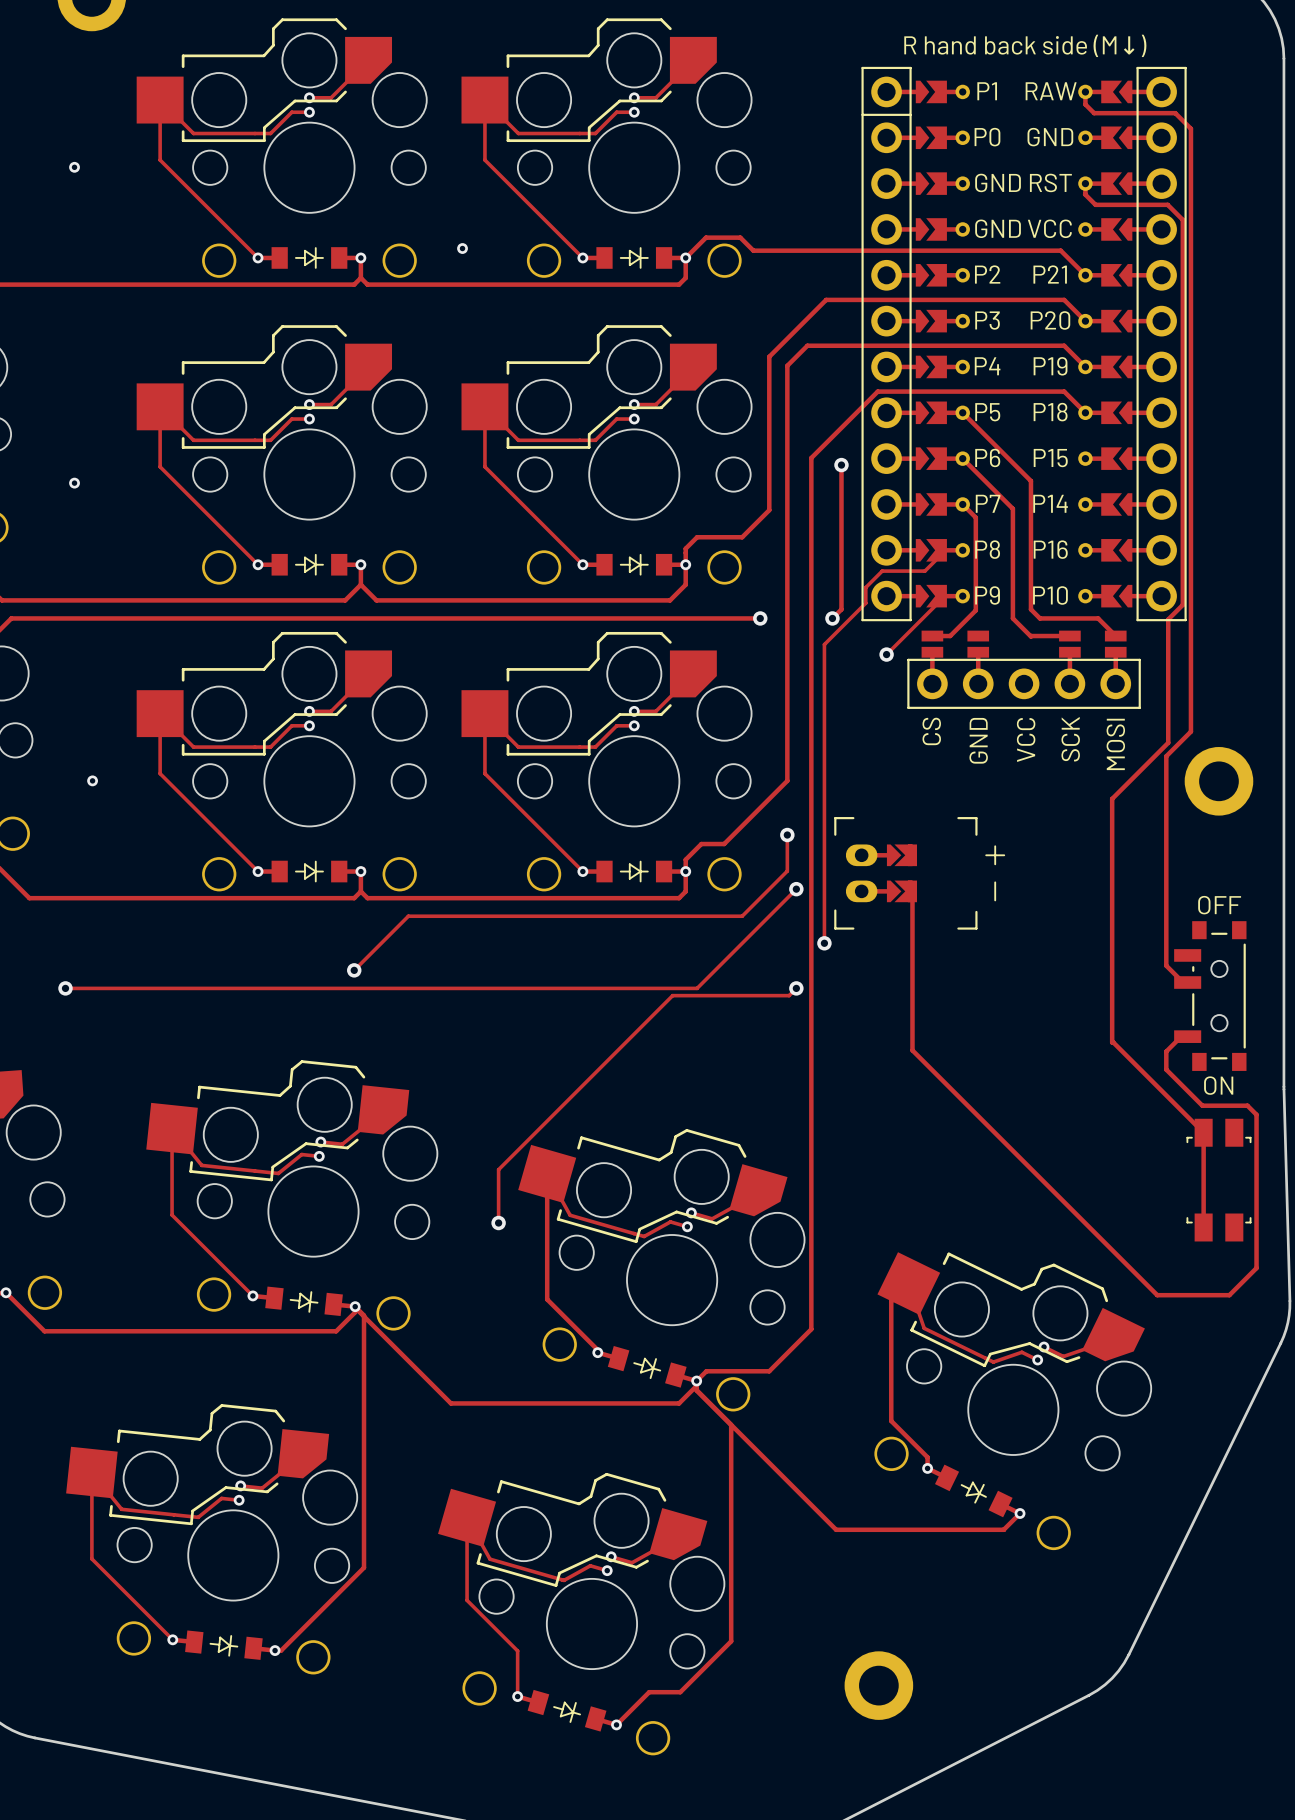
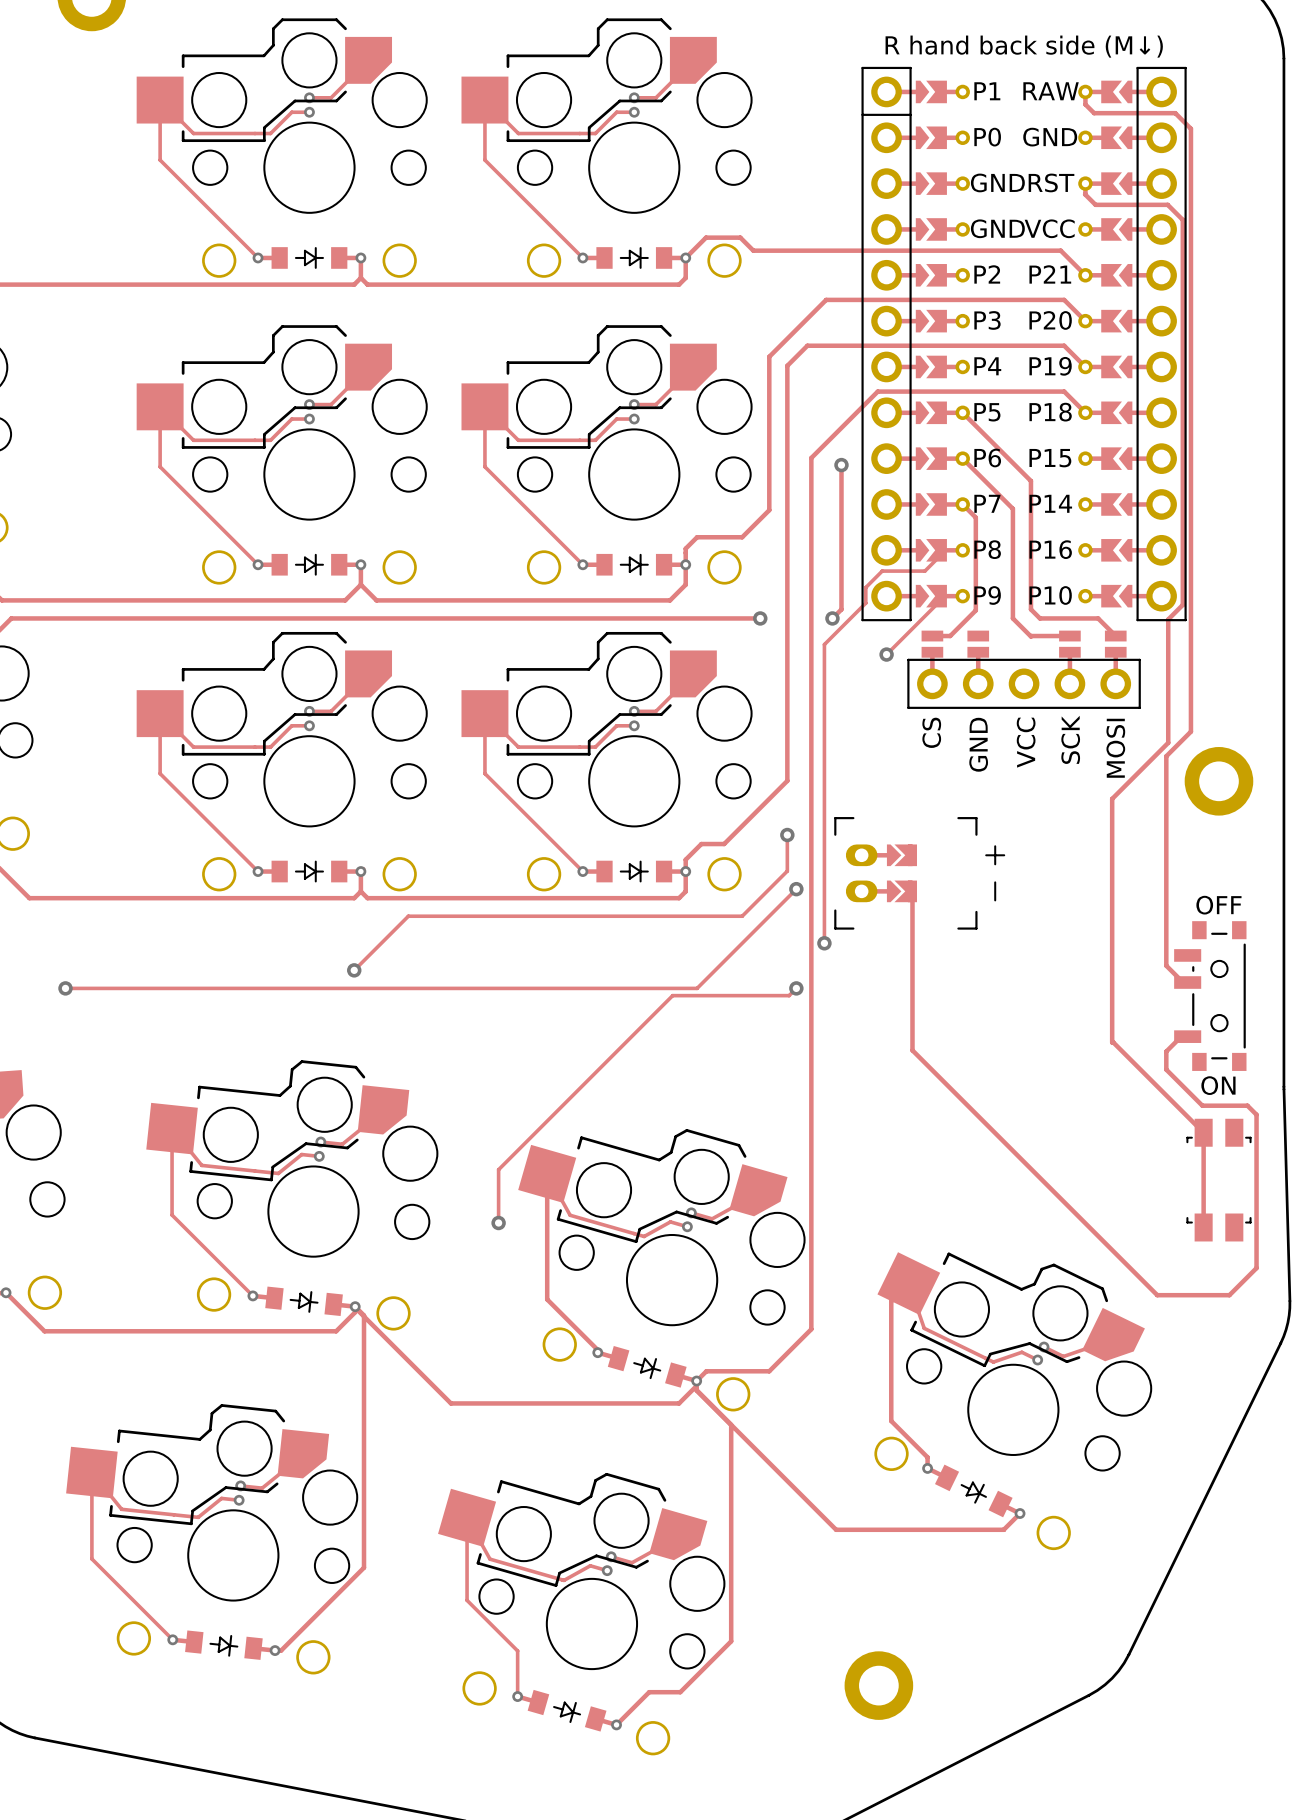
via: (74, 167) -> none
via: (462, 248) -> none
via: (74, 483) -> none
via: (92, 780) -> none

